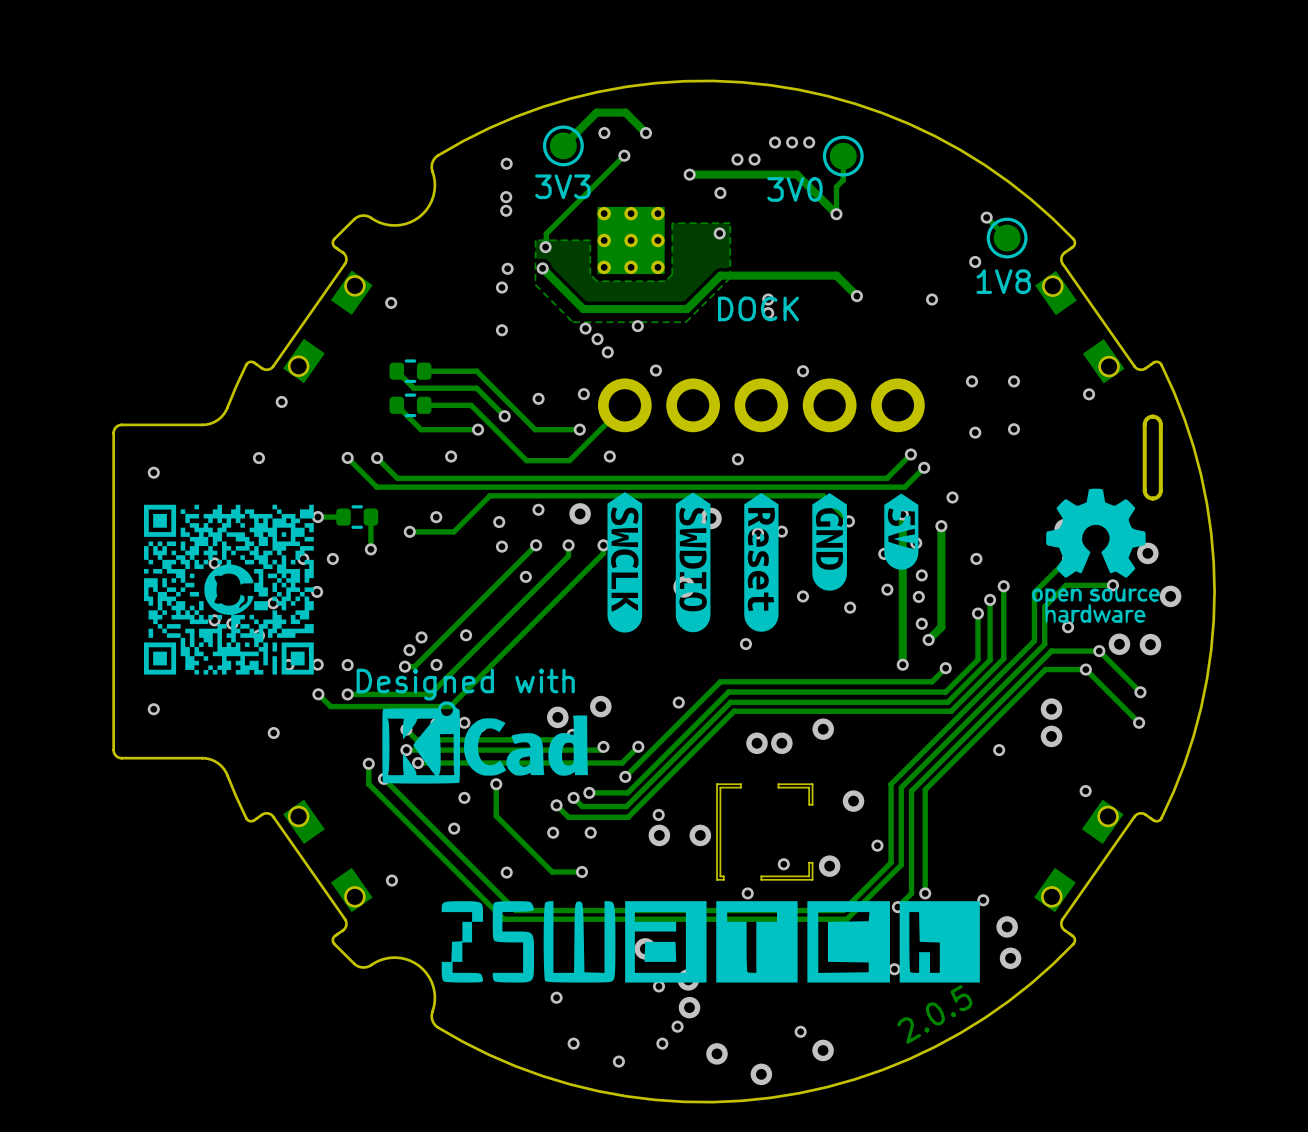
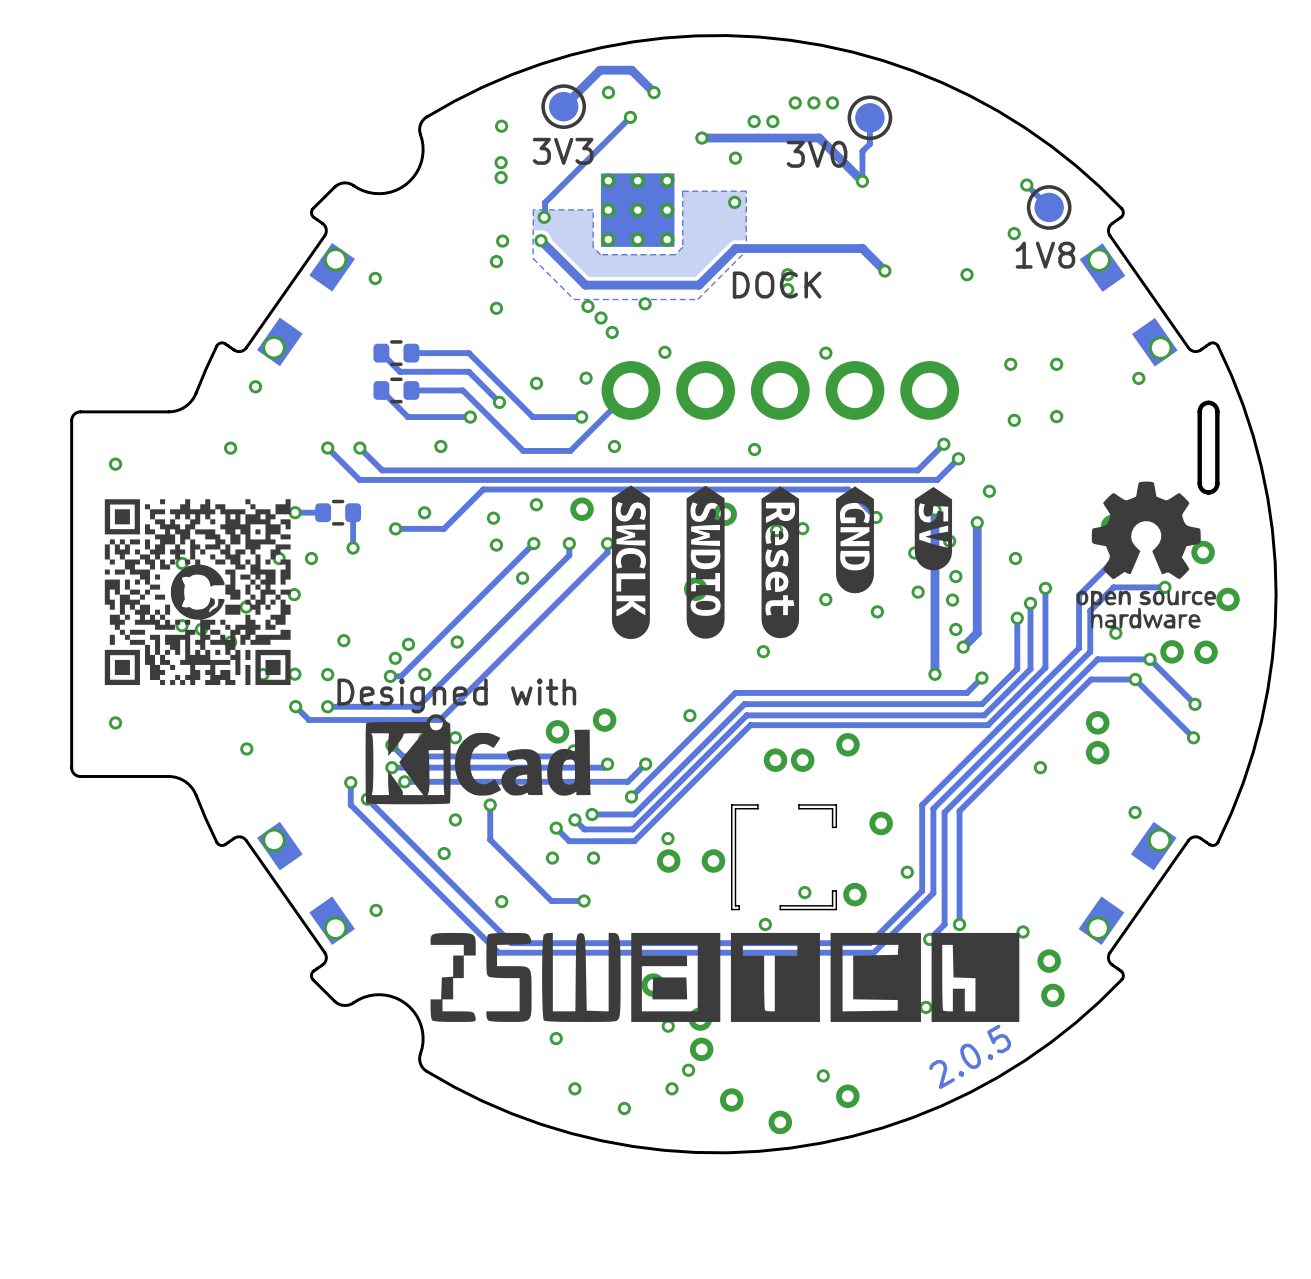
via: none -> (343, 640)

